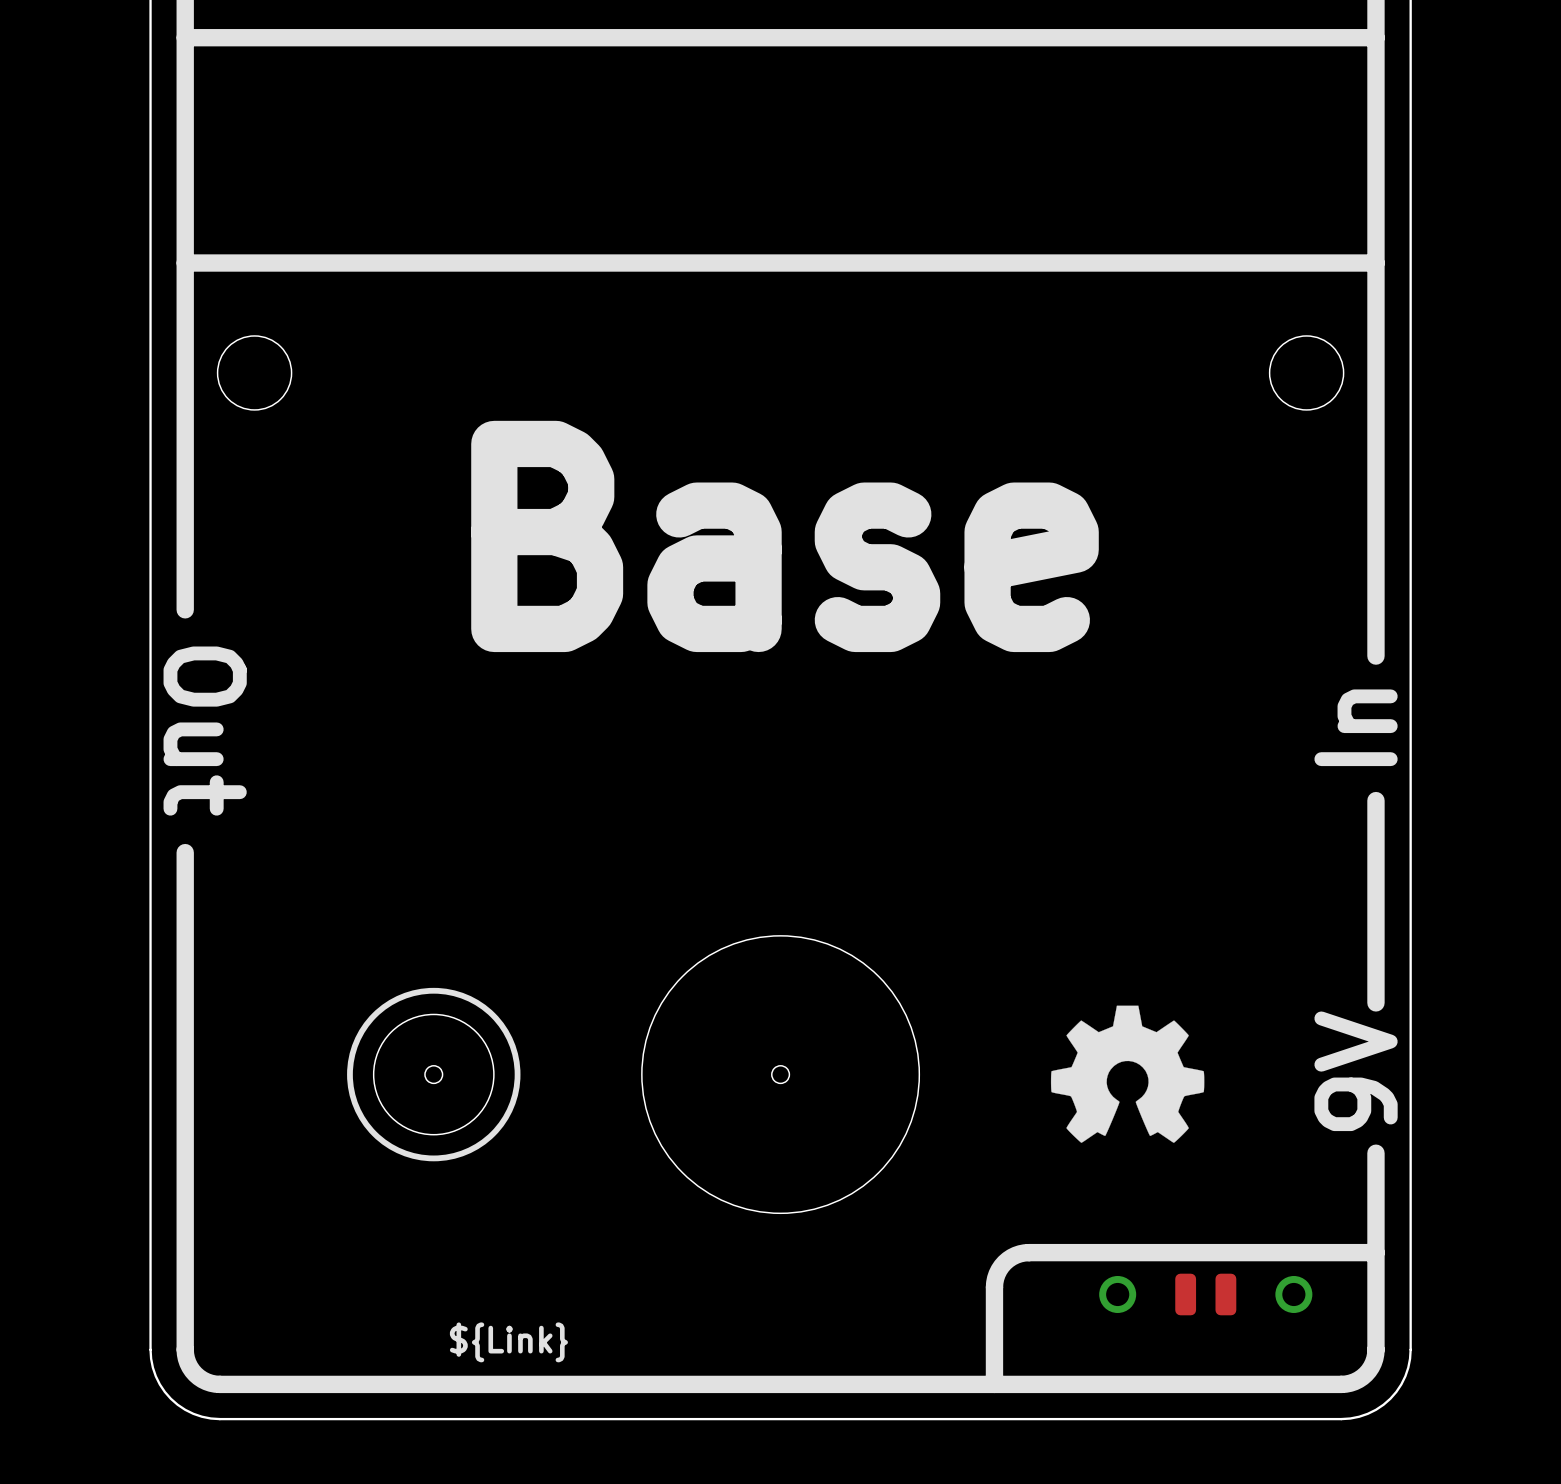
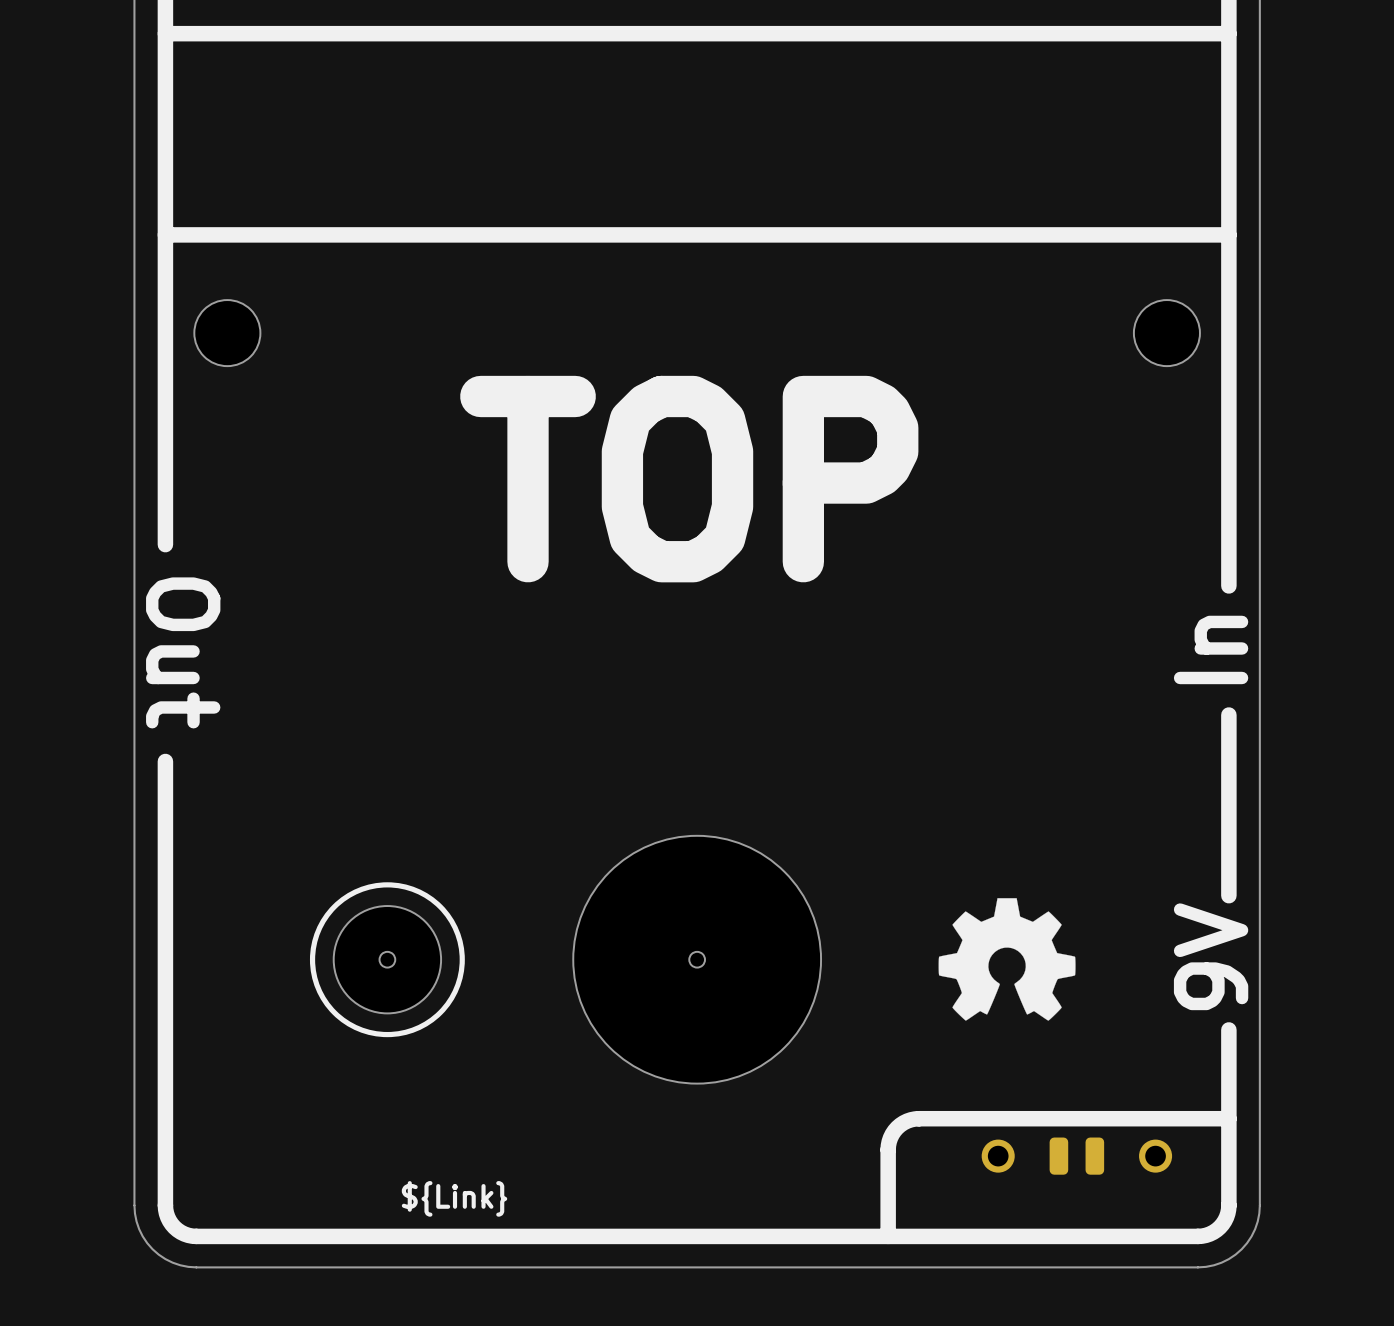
text: Base (785, 536) -> TOP (689, 479)

